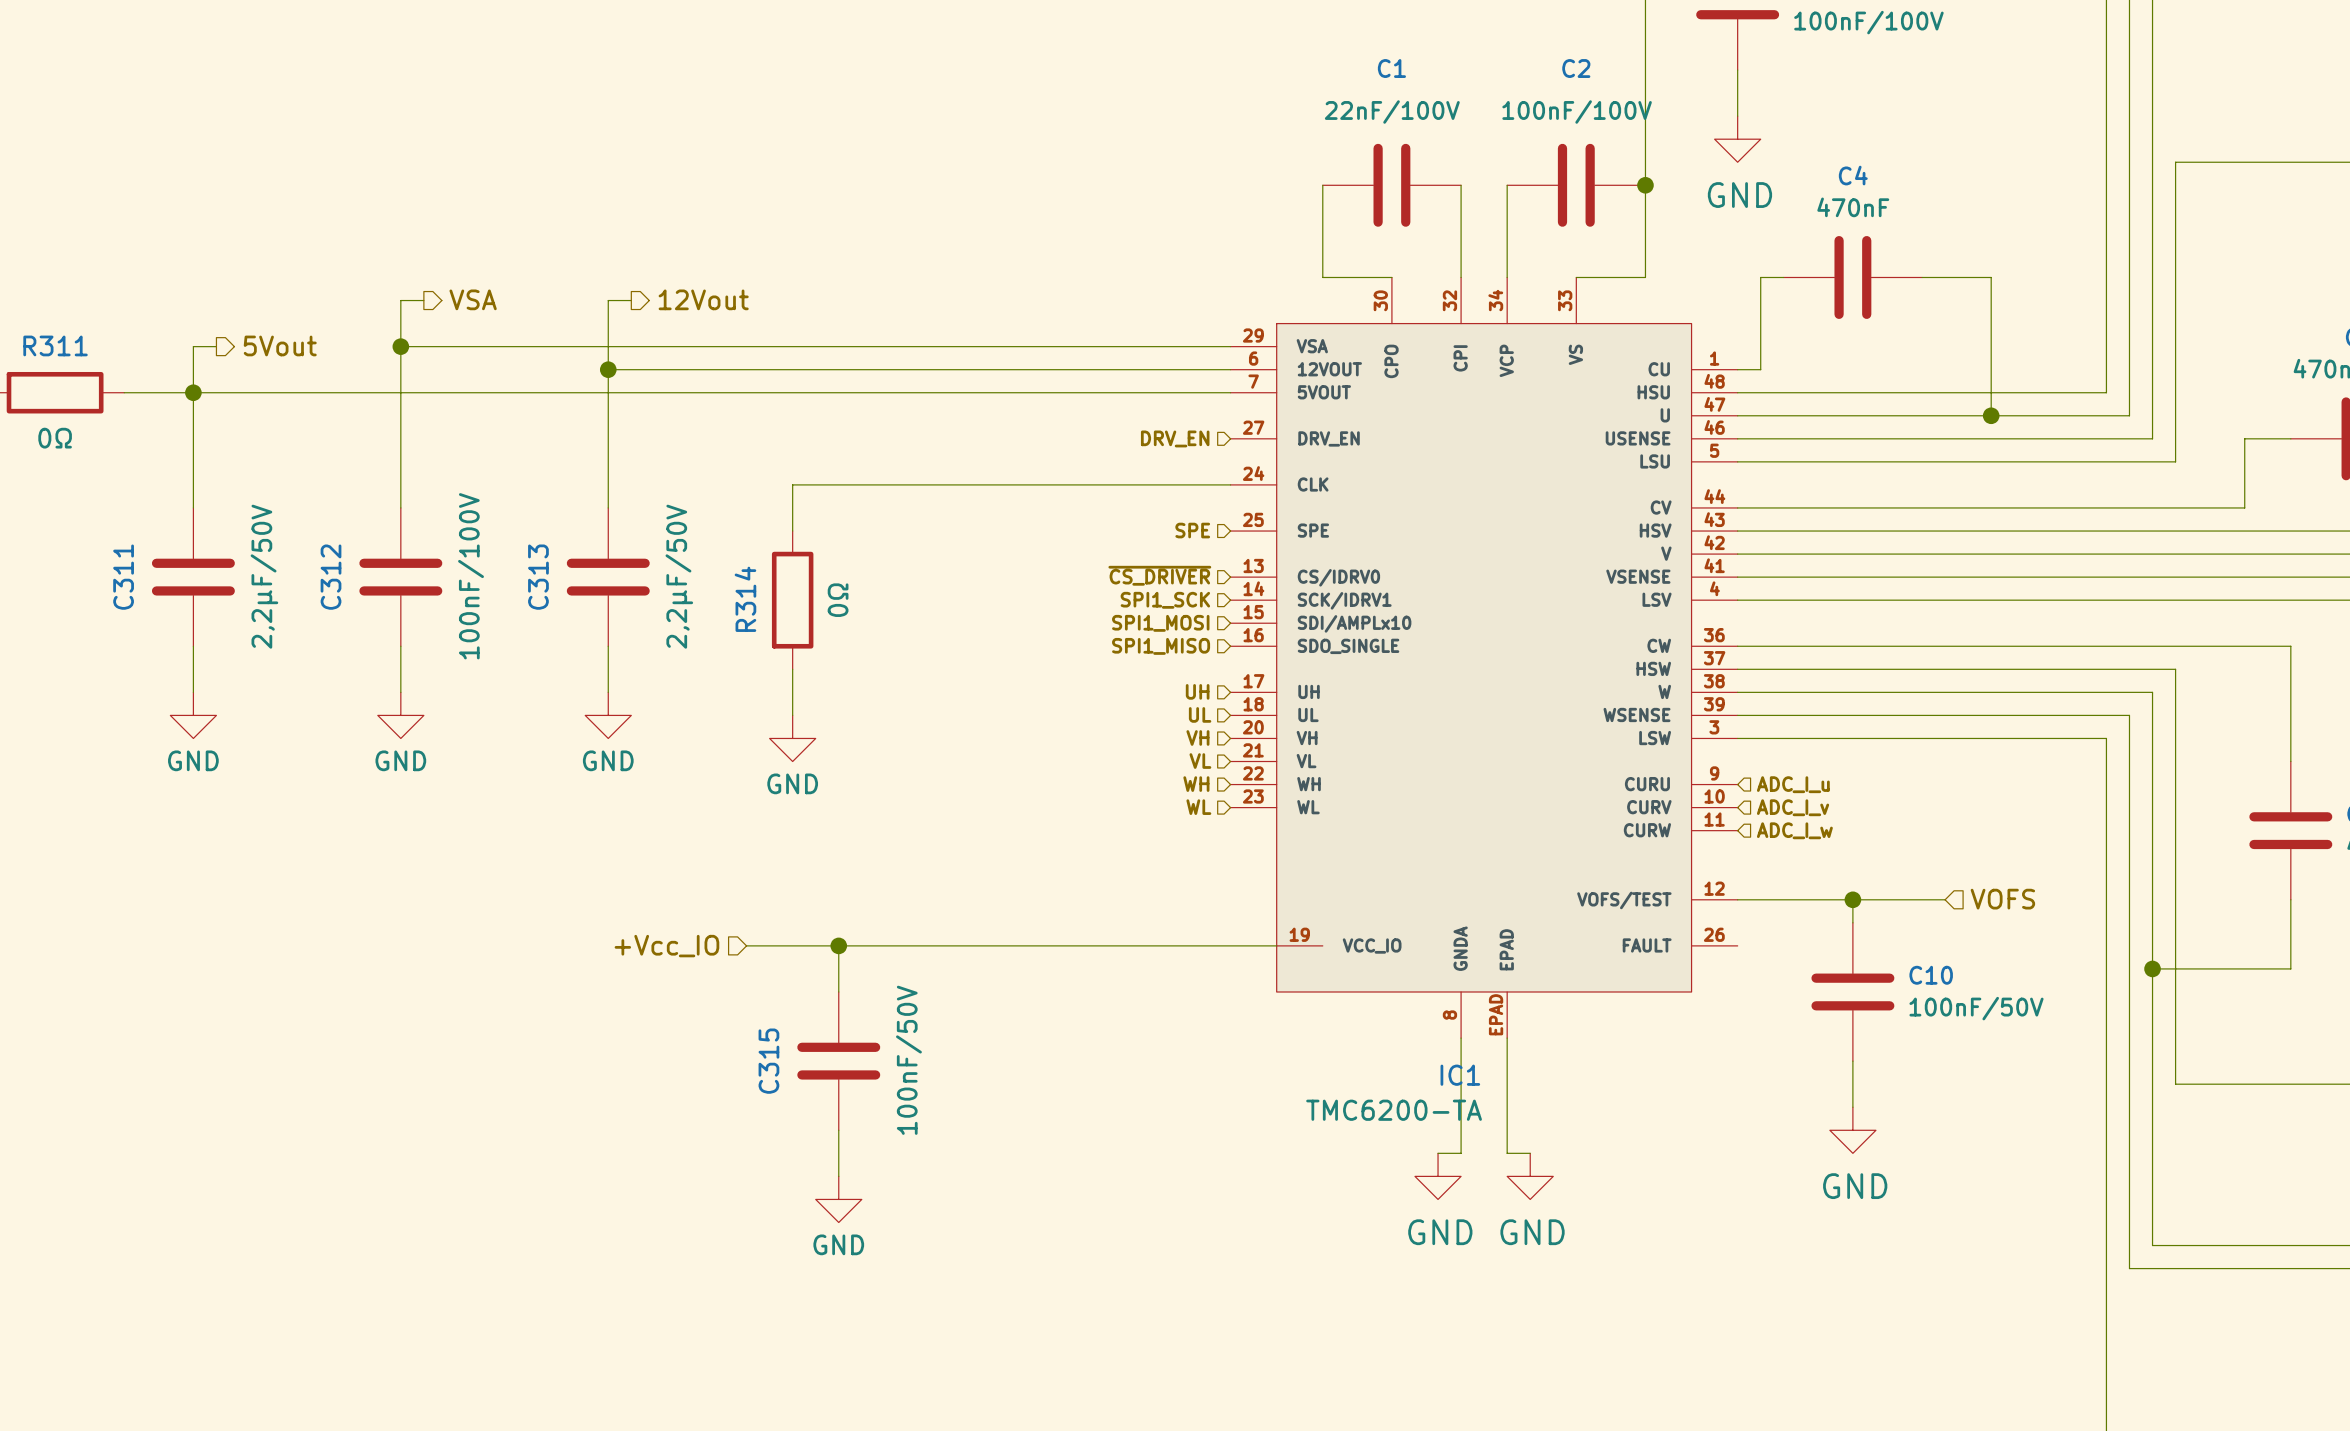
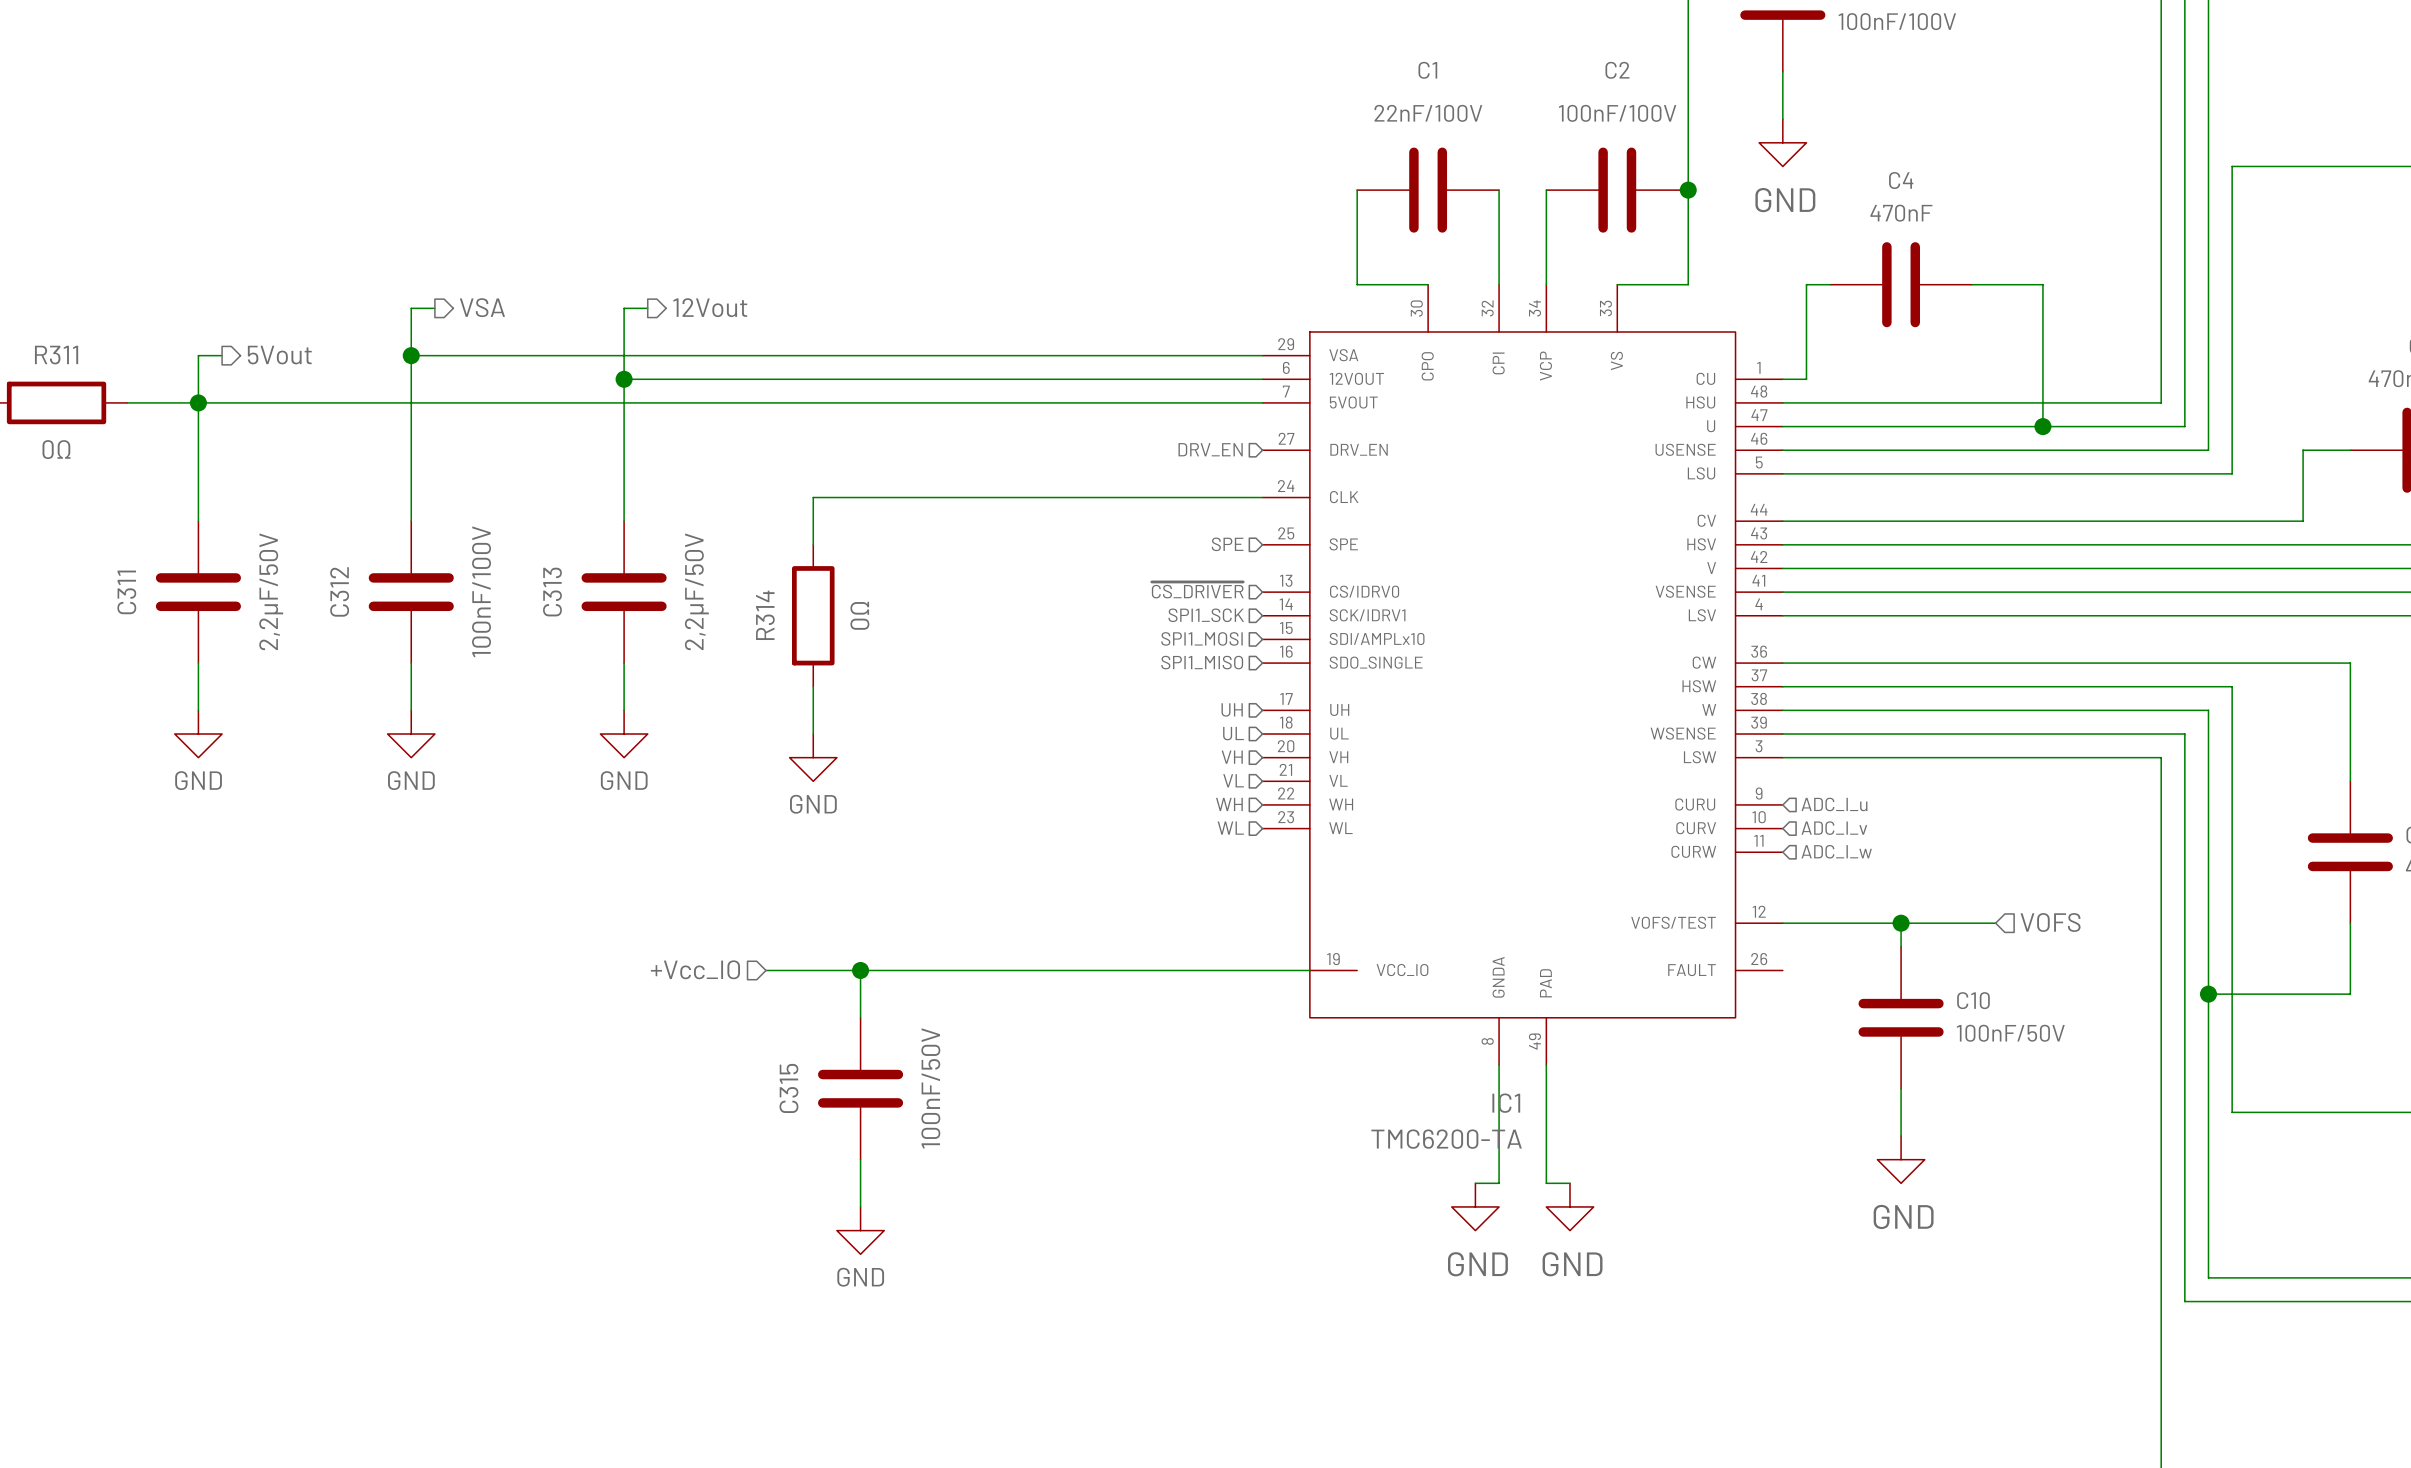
IC1 pin name: EPAD (1506, 949) -> PAD (1545, 983)
IC1 pin number: EPAD (1496, 1014) -> 49 (1534, 1041)

